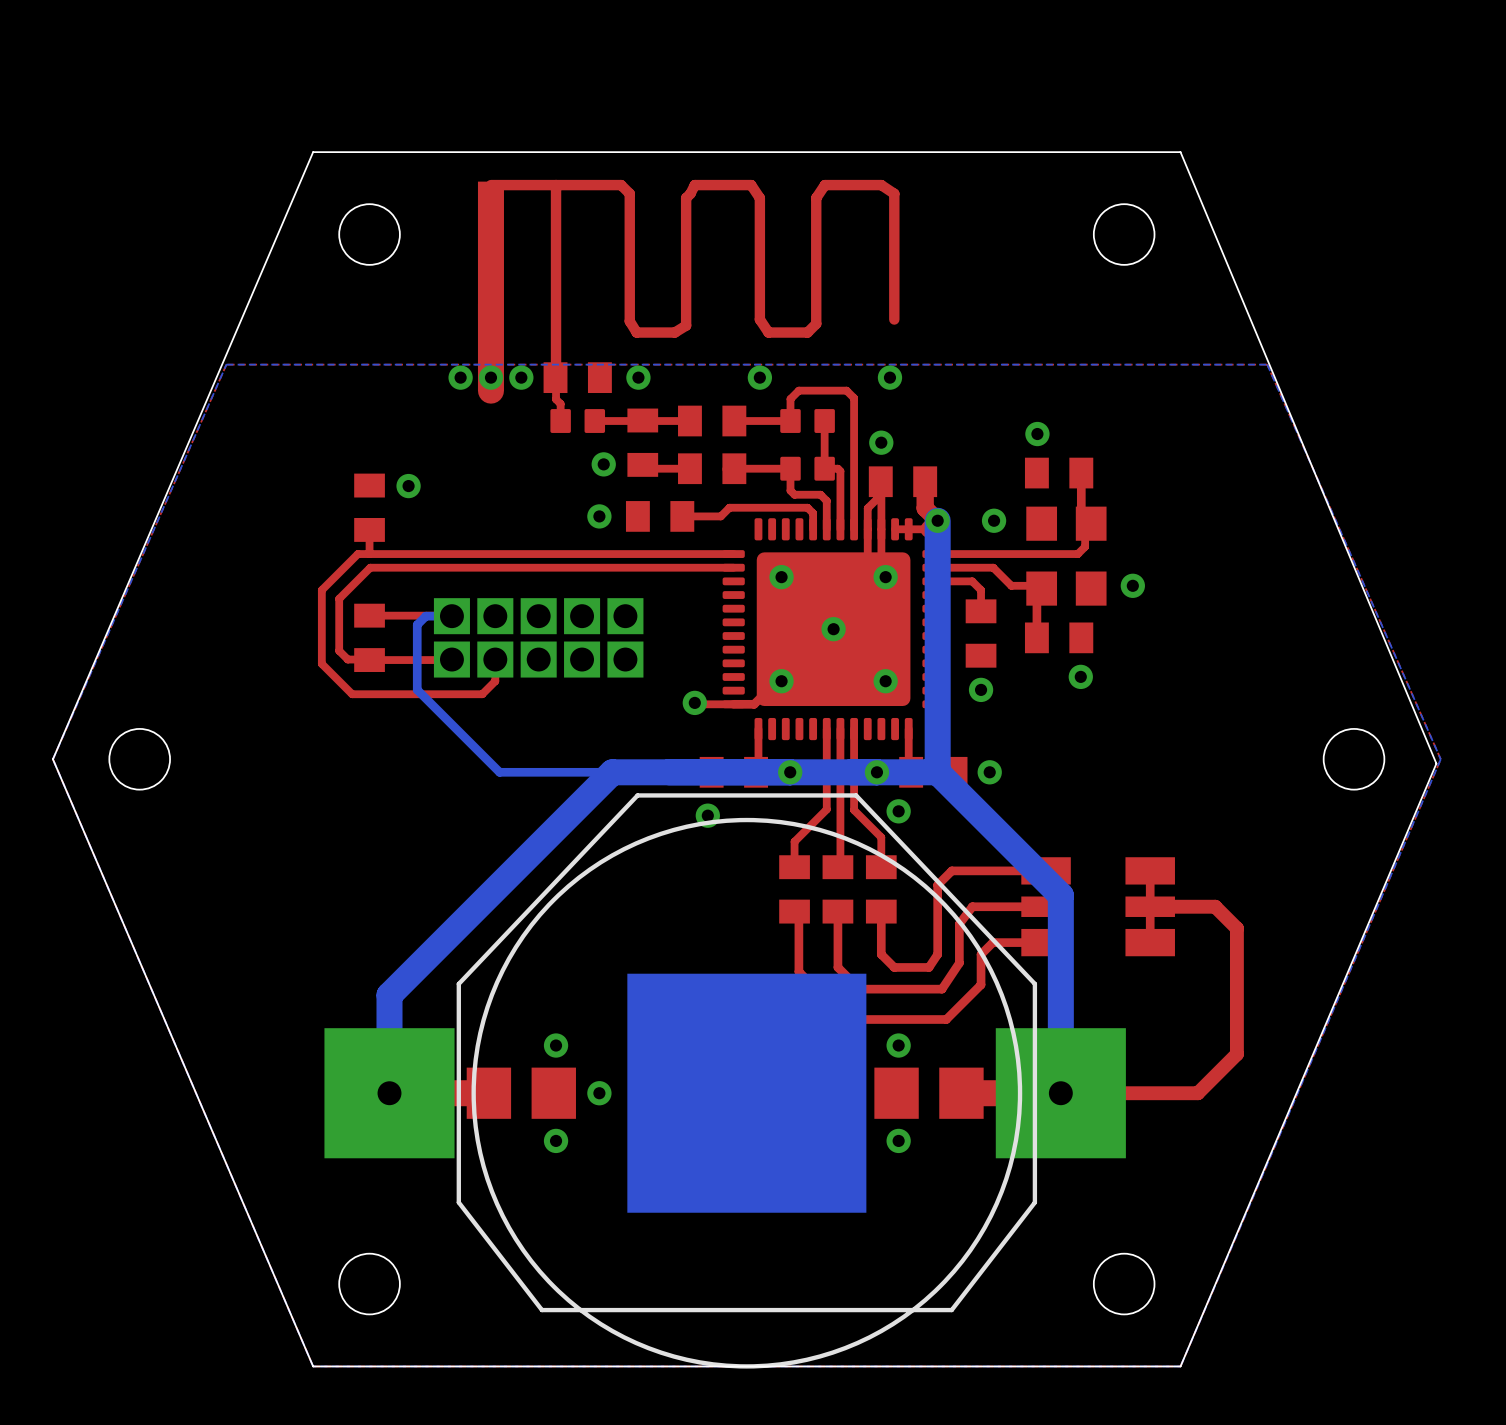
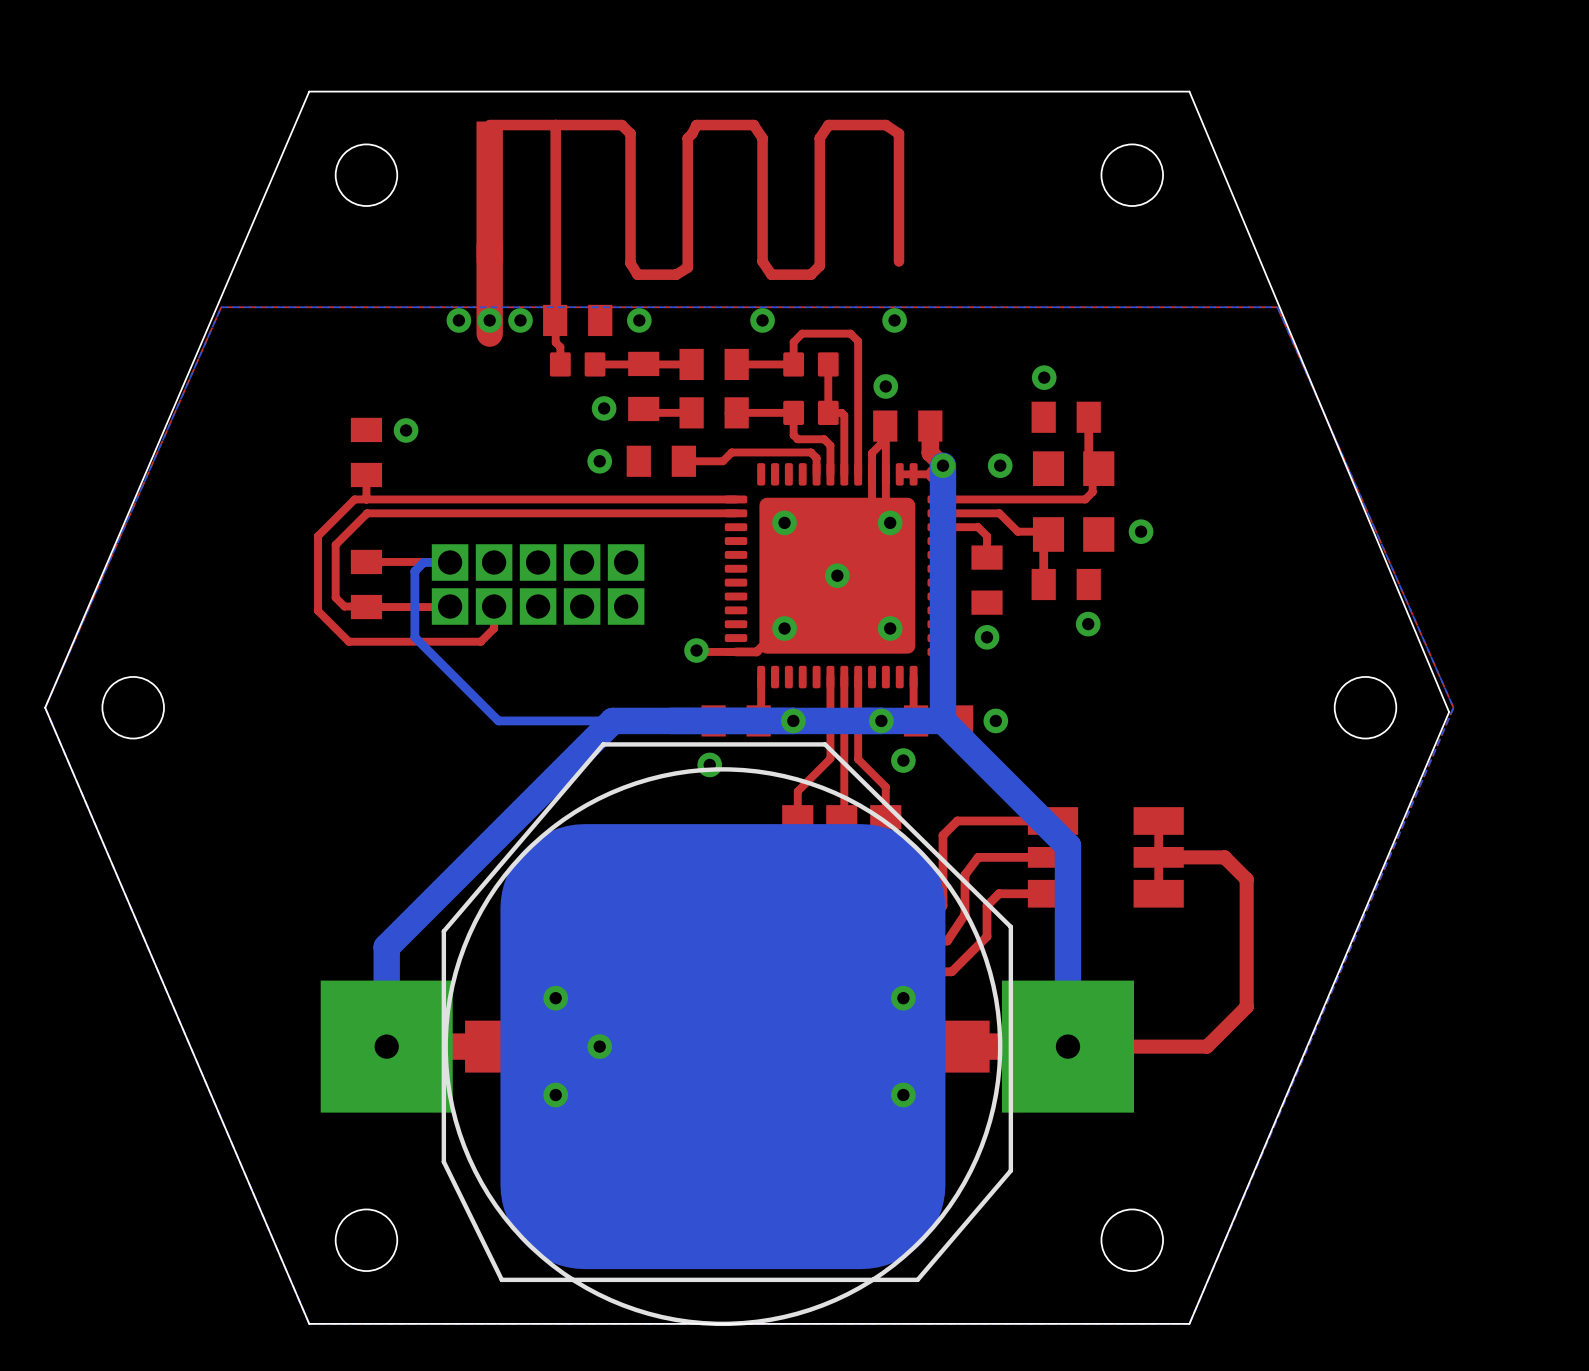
part footprint: [324, 793, 1126, 1369] -> [320, 742, 1135, 1327]

